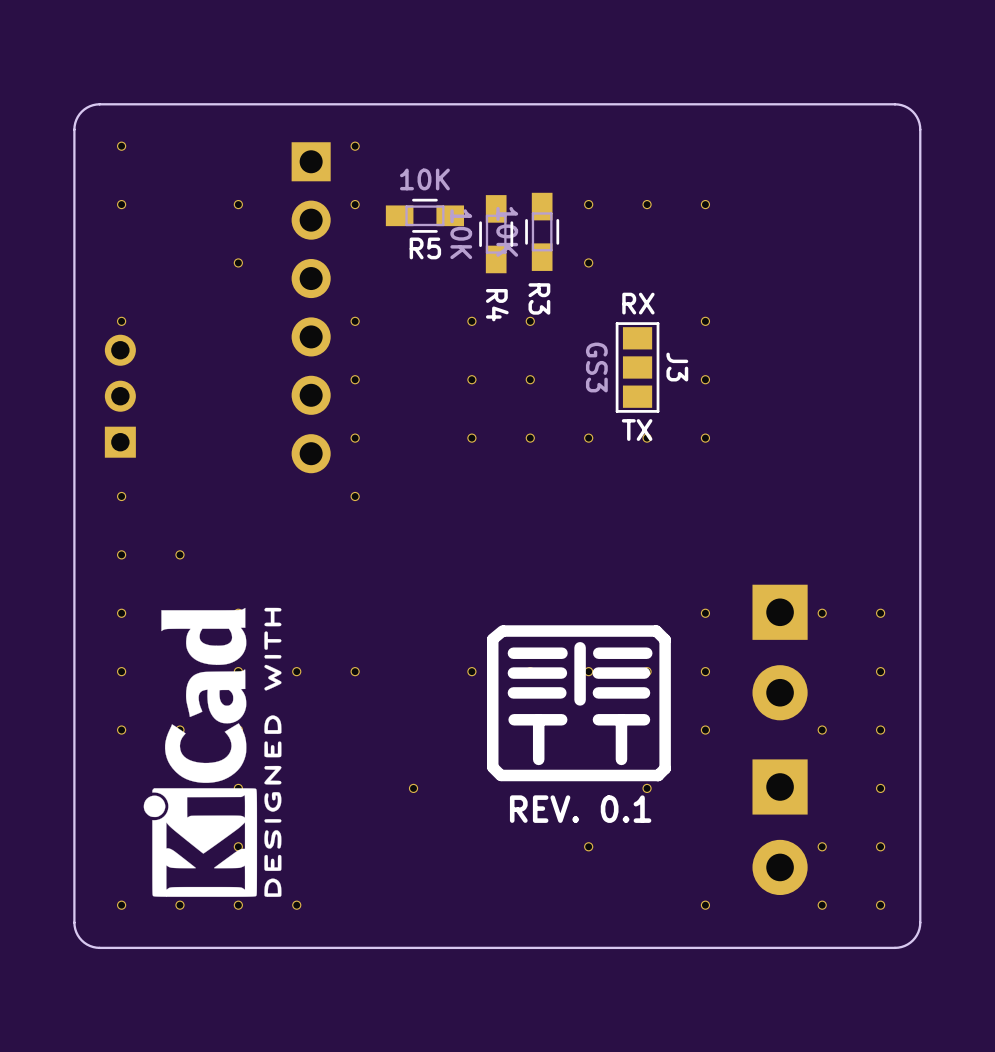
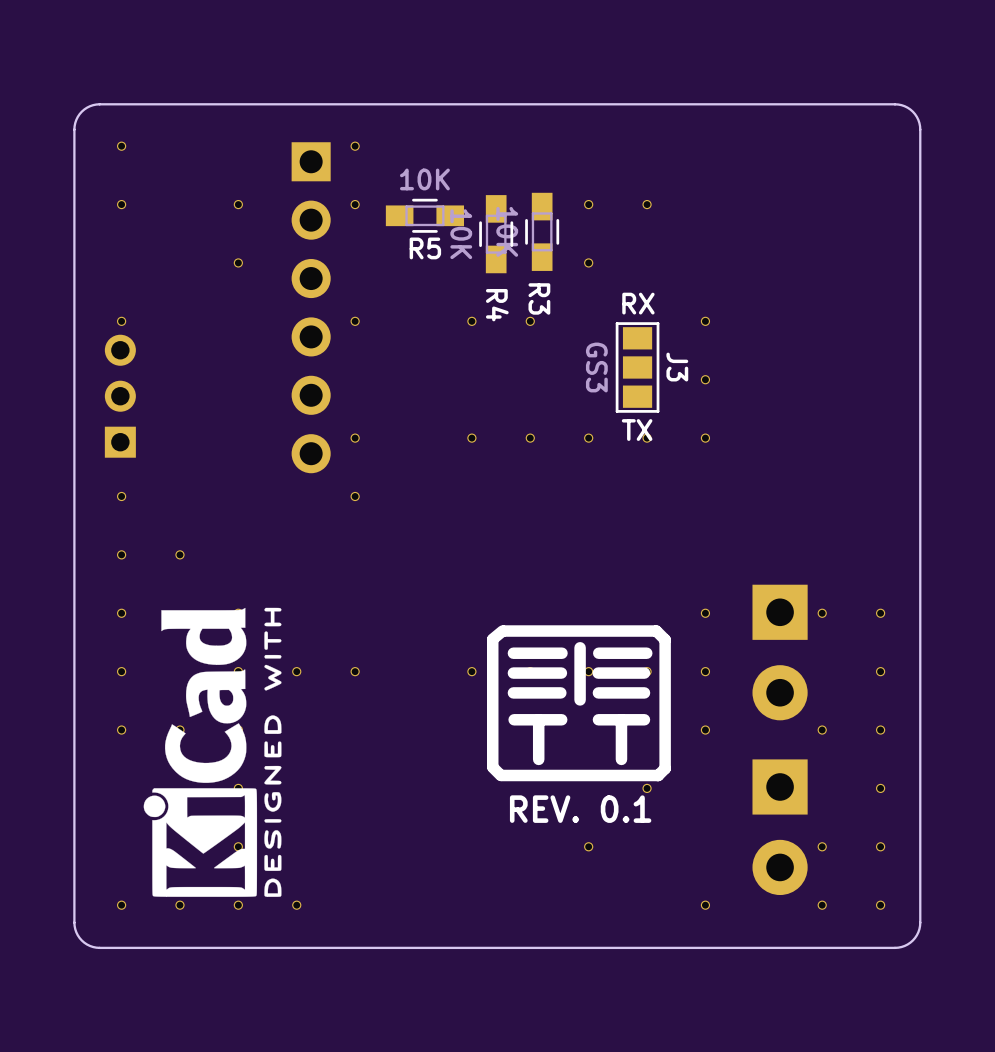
part: (705, 204) -> none
part: (355, 379) -> none
part: (471, 379) -> none
part: (530, 379) -> none
part: (413, 788) -> none

